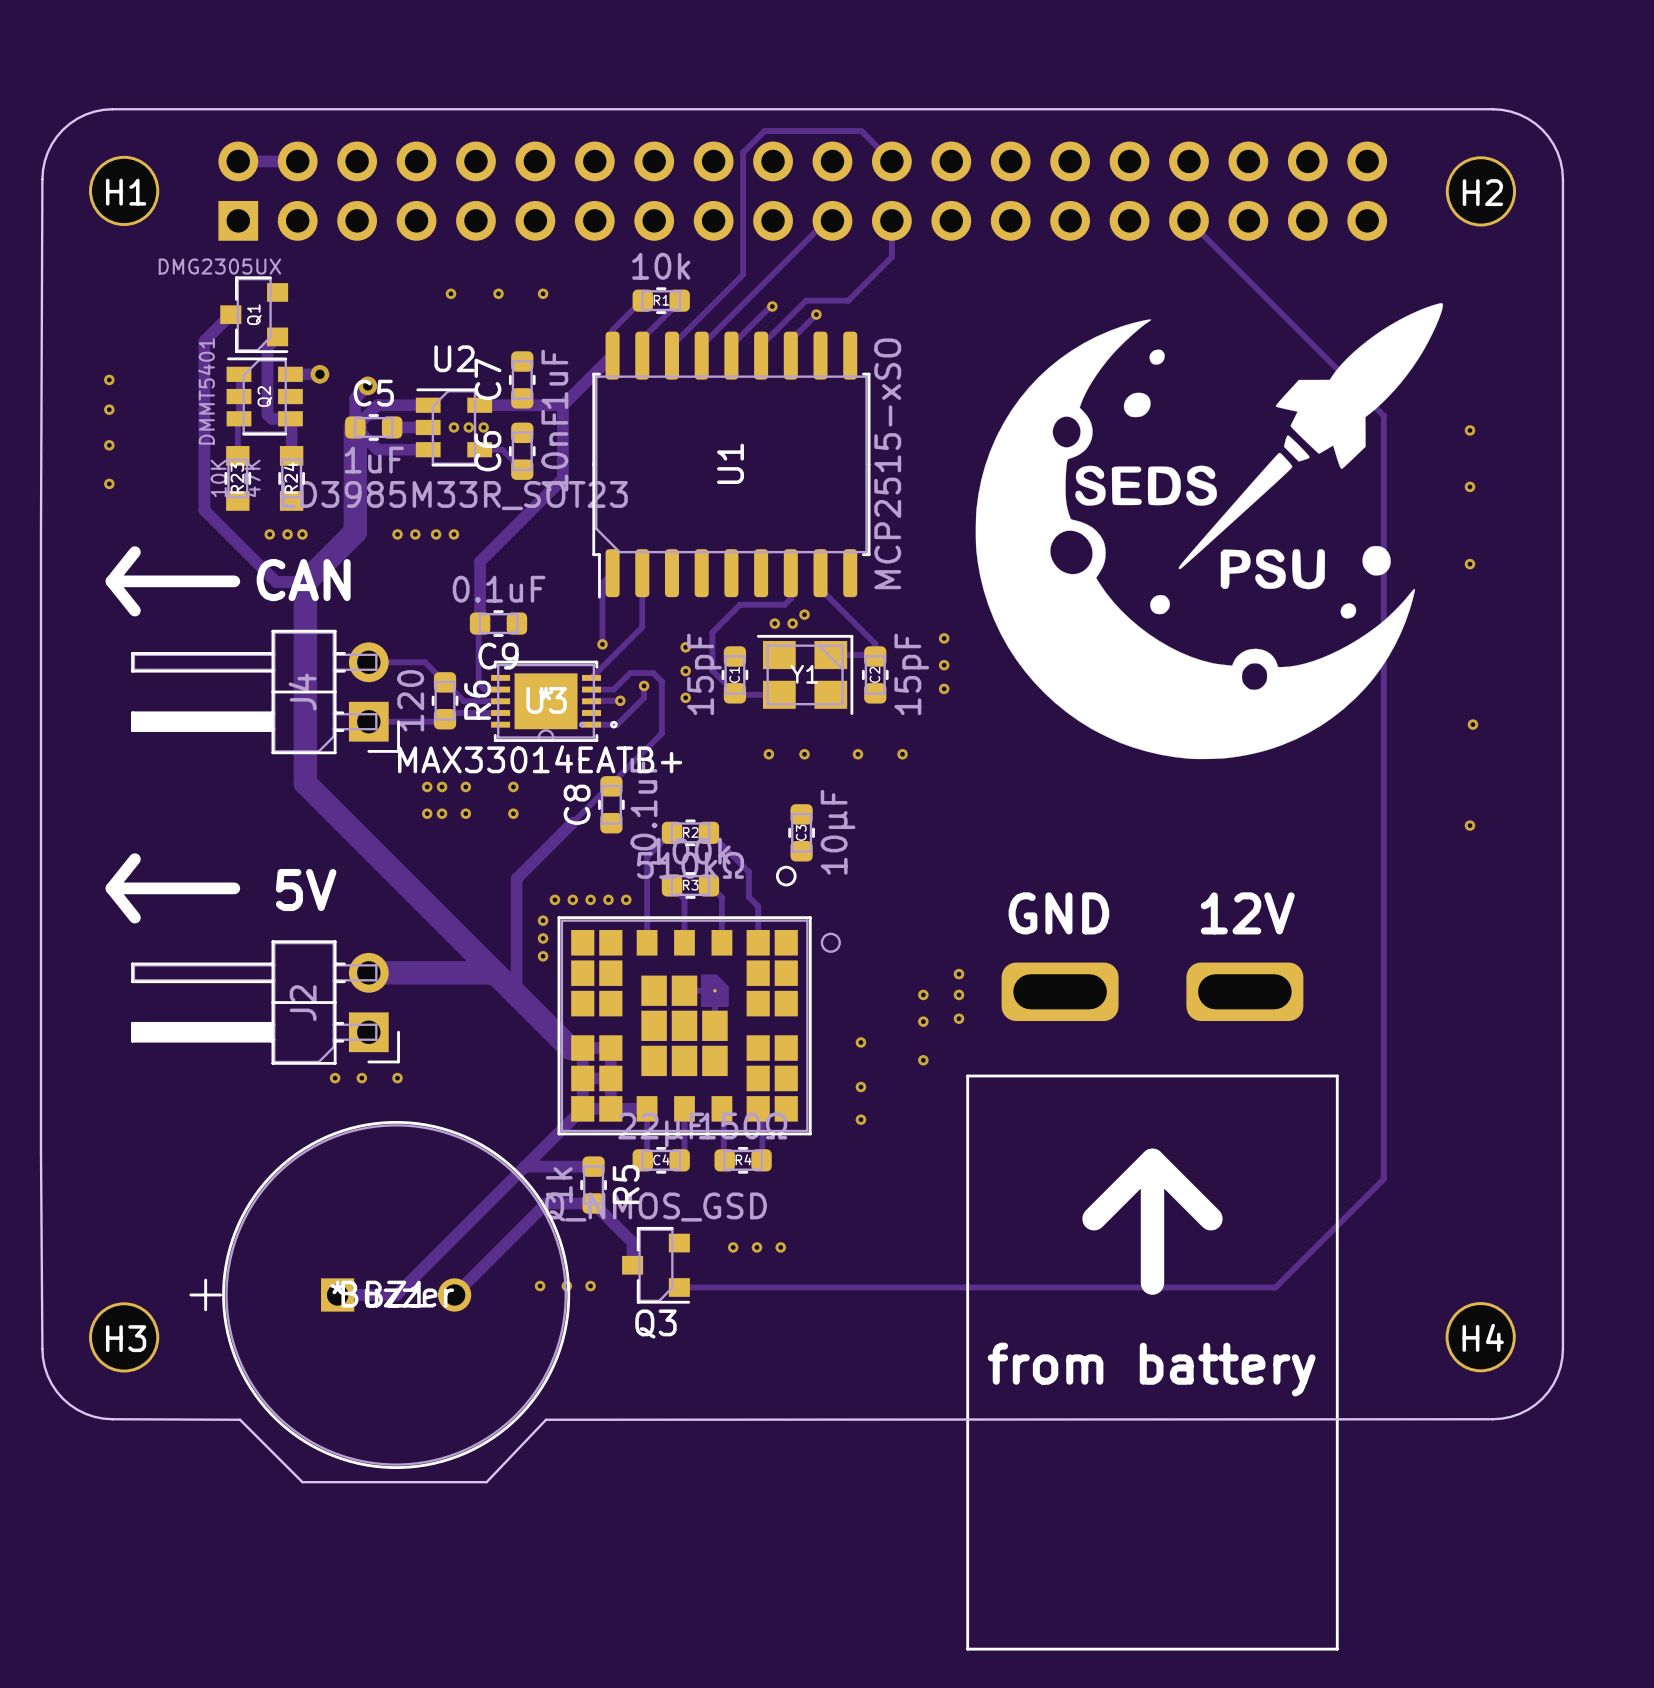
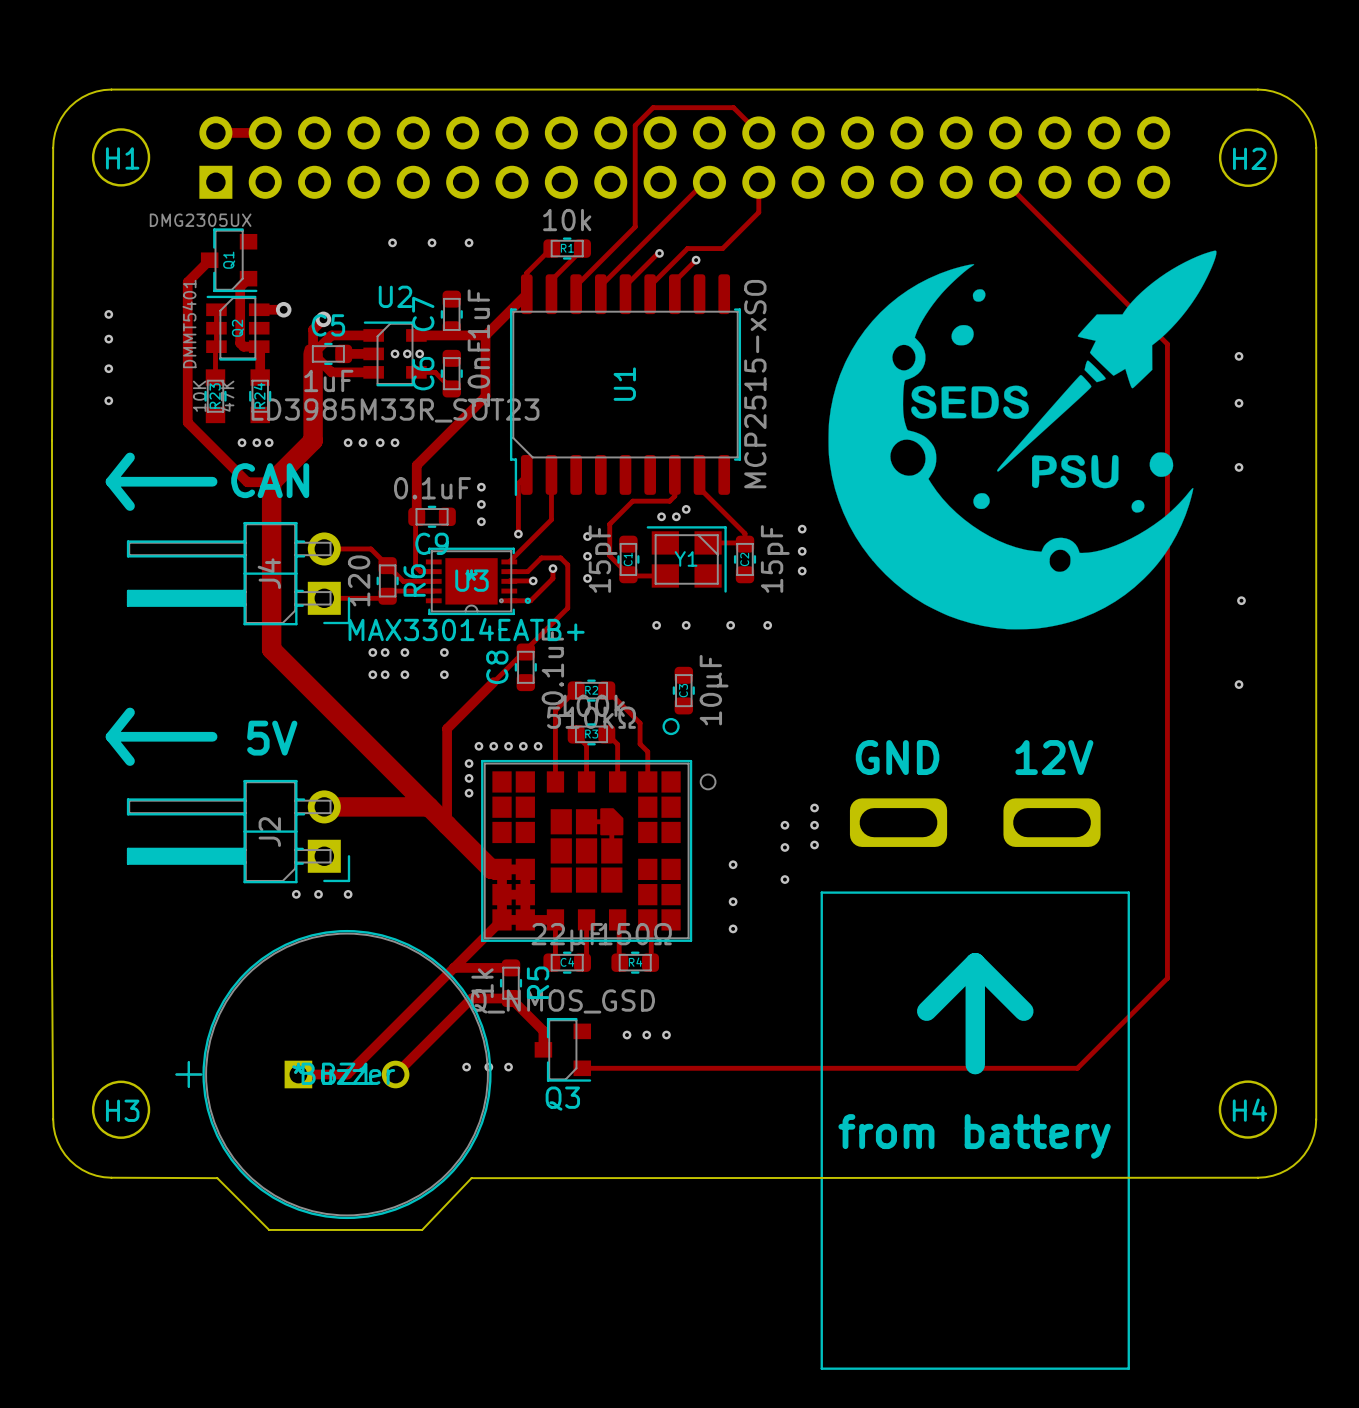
via: none -> (481, 487)
via: none -> (481, 504)
via: none -> (481, 521)

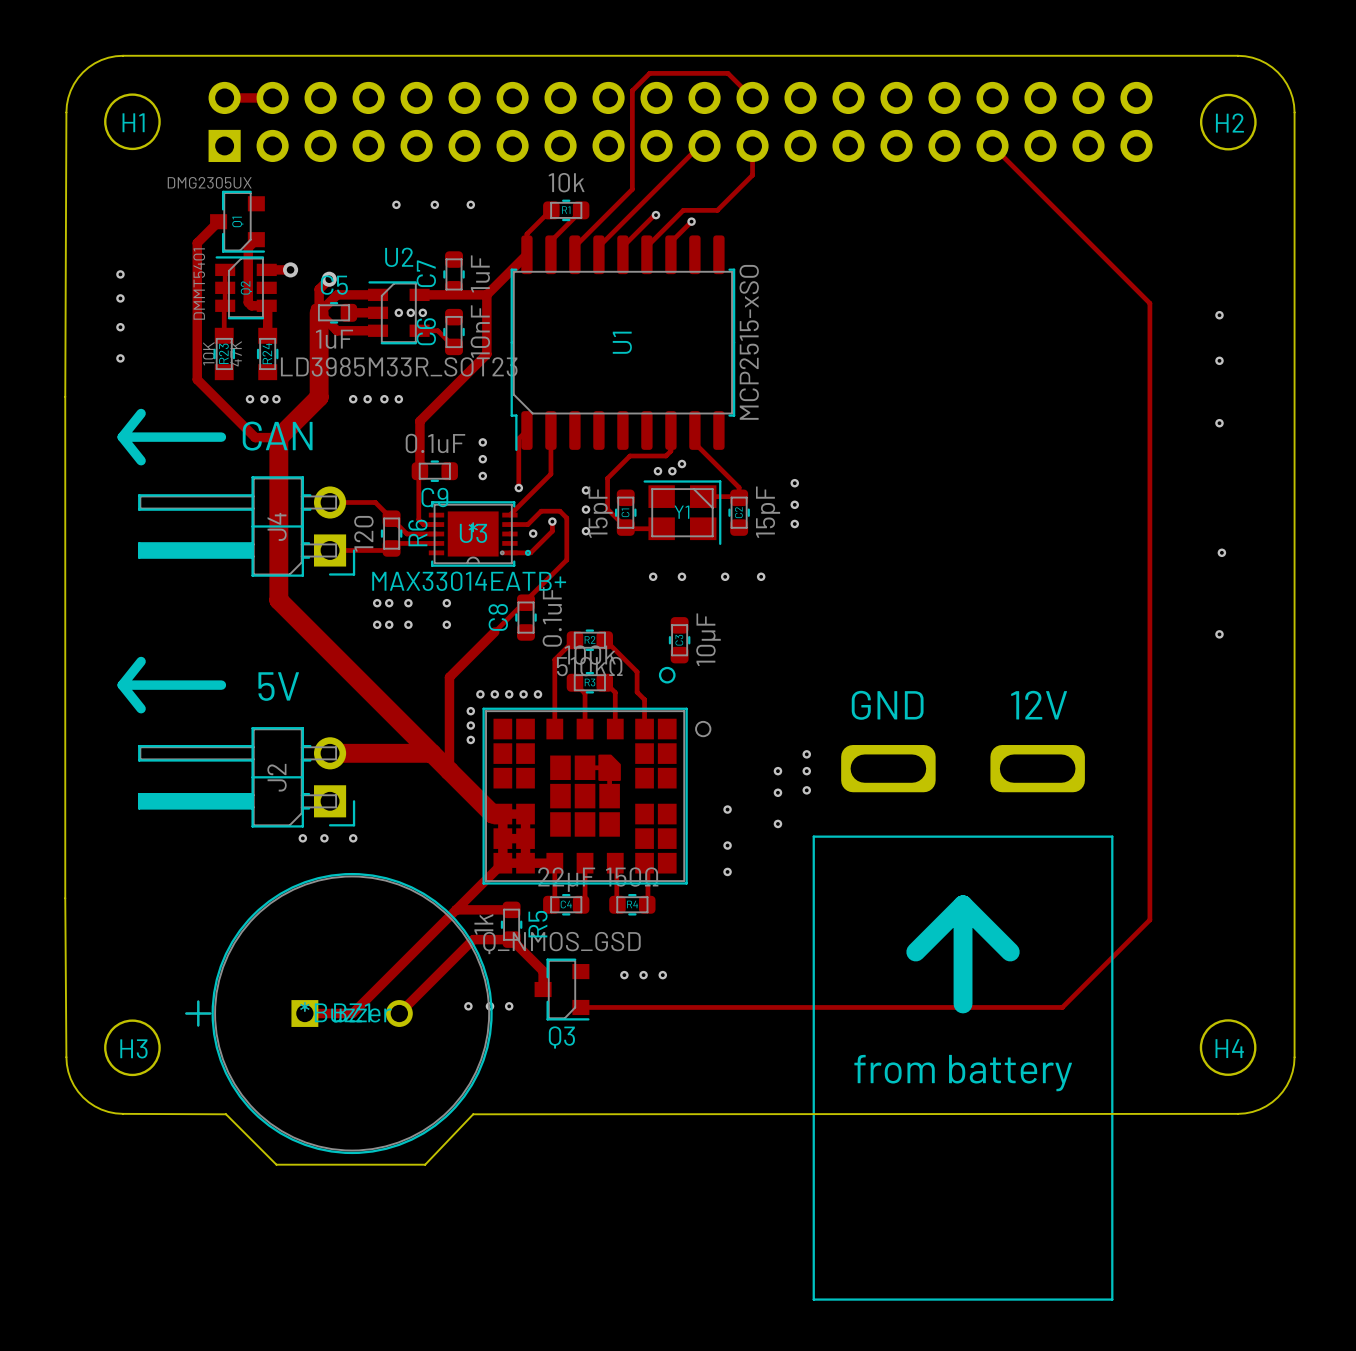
drawing: [828, 250, 1217, 630] -> none
track: (509, 580) (533, 580) -> none

